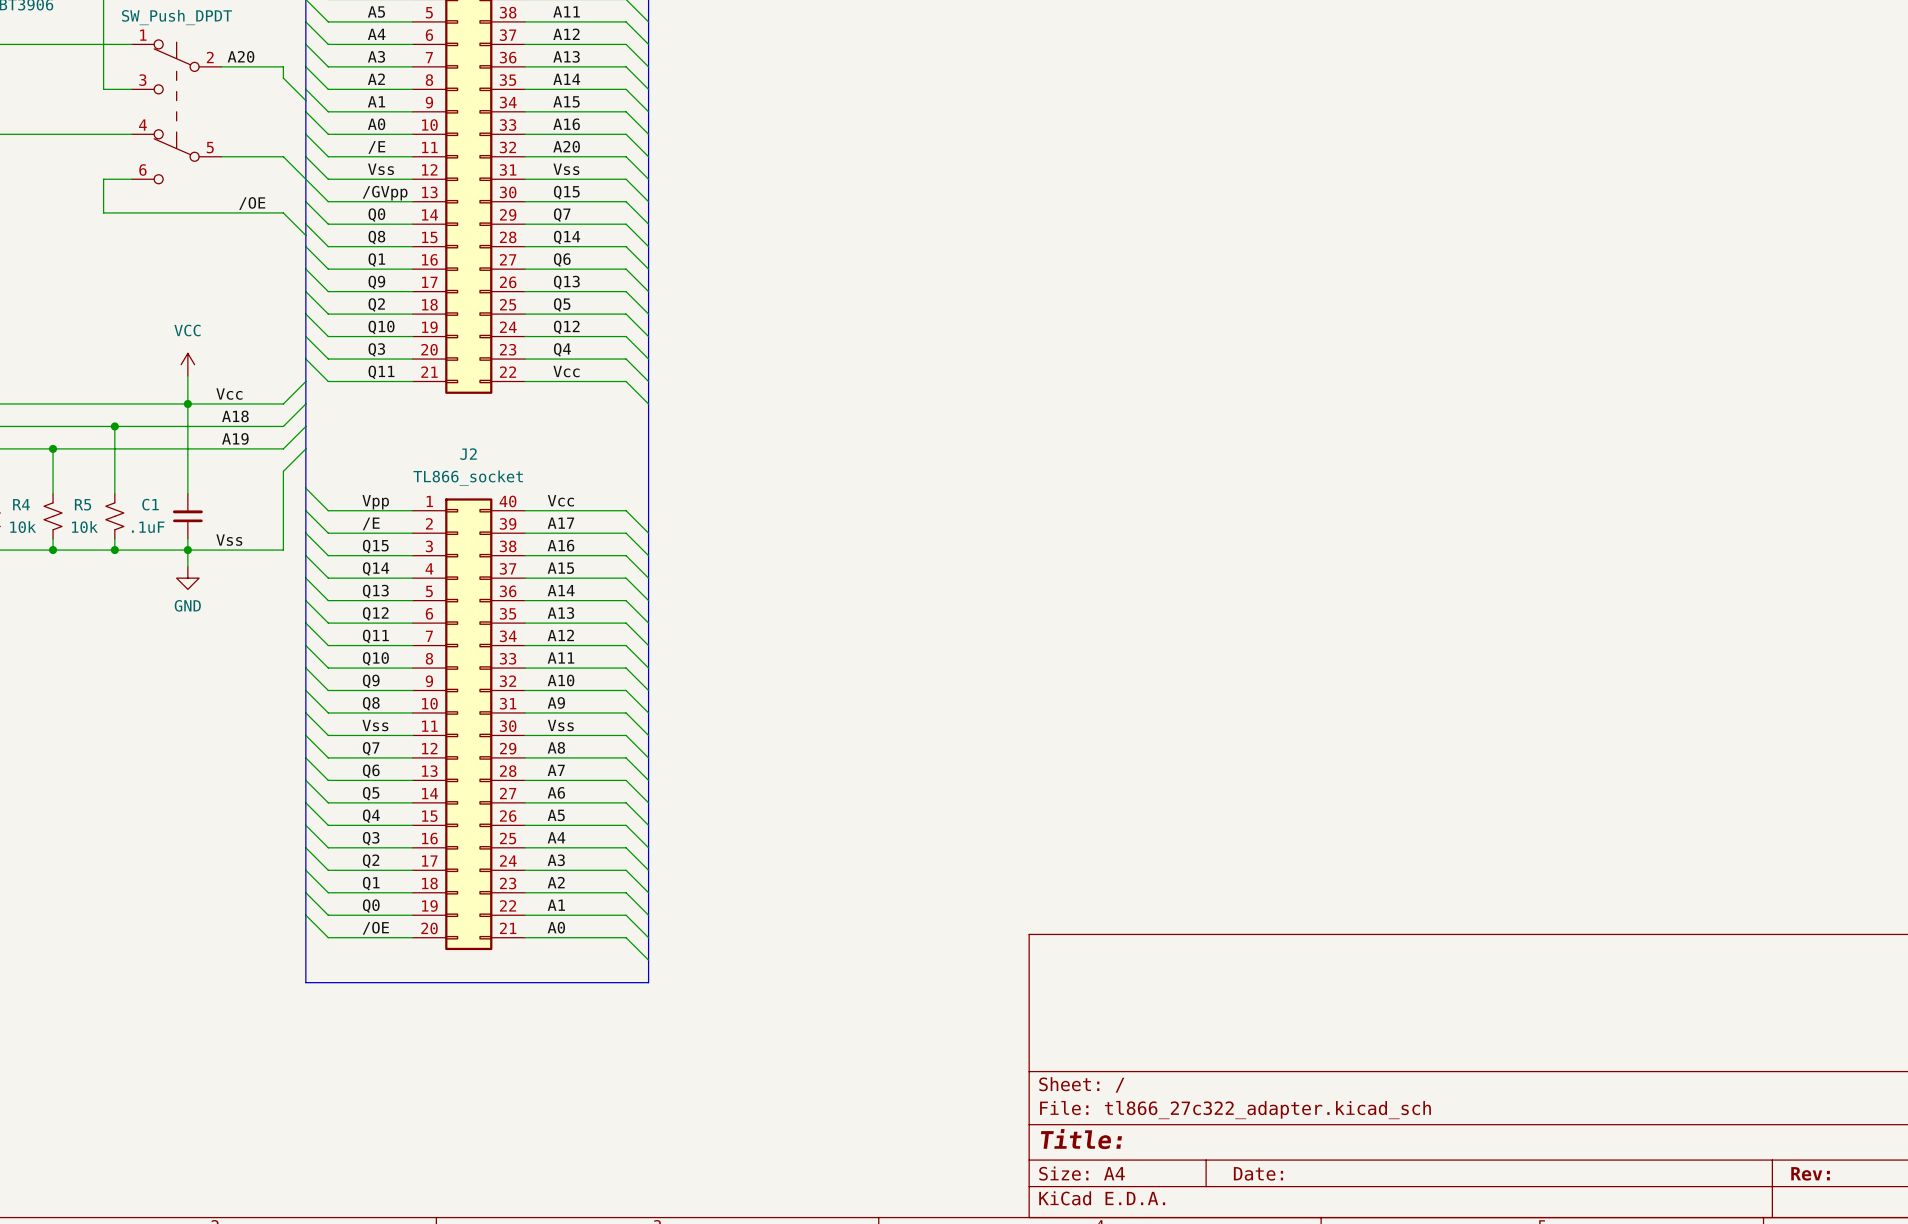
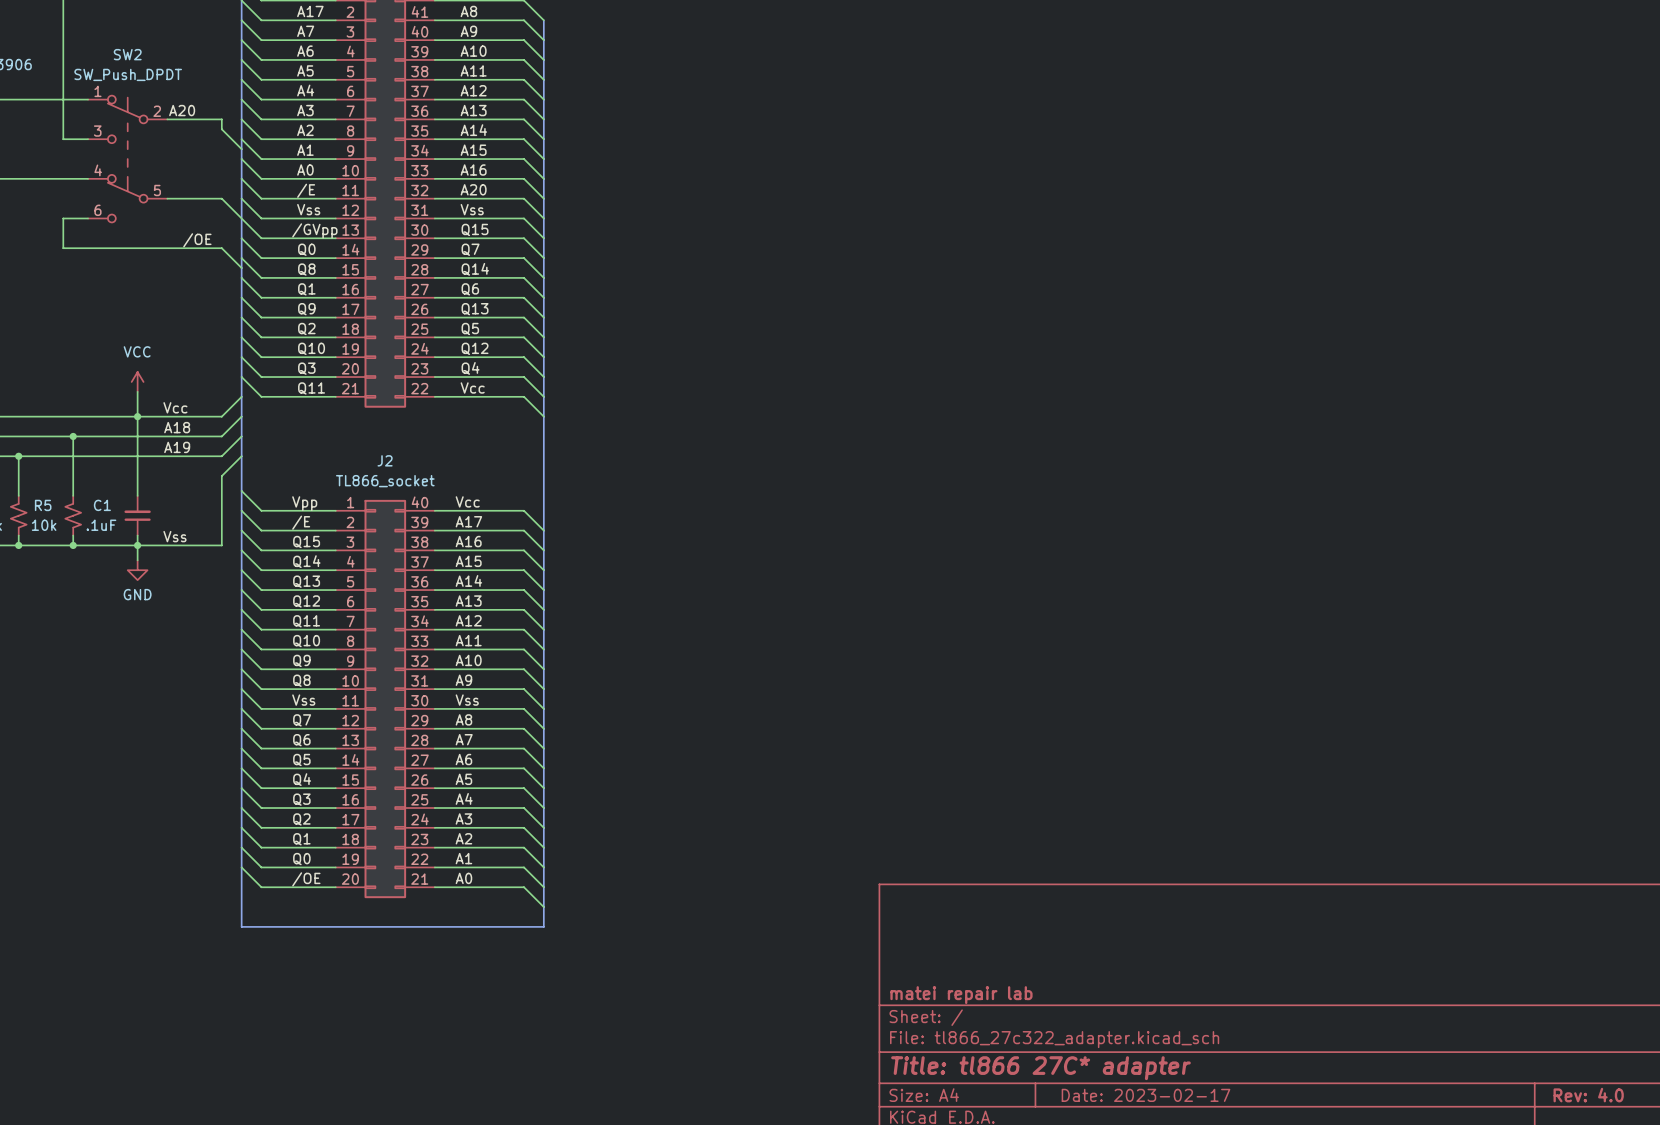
title block: none -> matei repair lab (961, 995)
title block: Title: (1081, 1139) -> Title: tl866 27C* adapter (1040, 1068)
title block: Date: (1258, 1173) -> Date: 2023-02-17 (1146, 1095)
title block: Rev: (1810, 1173) -> Rev: 4.0 (1588, 1095)

